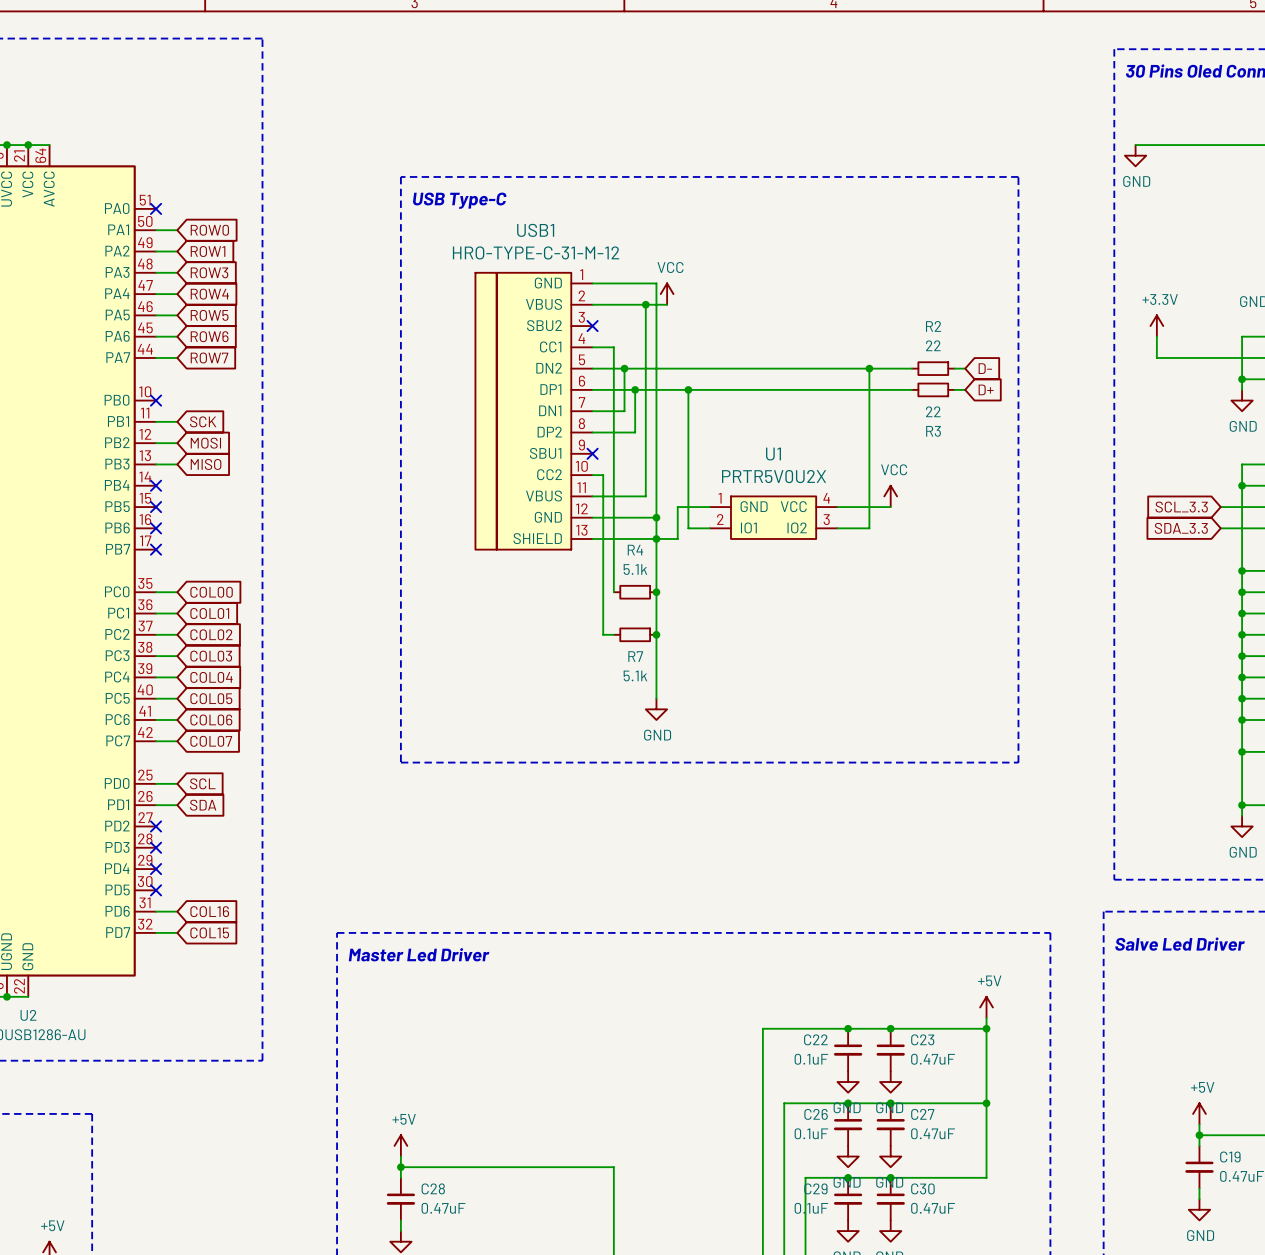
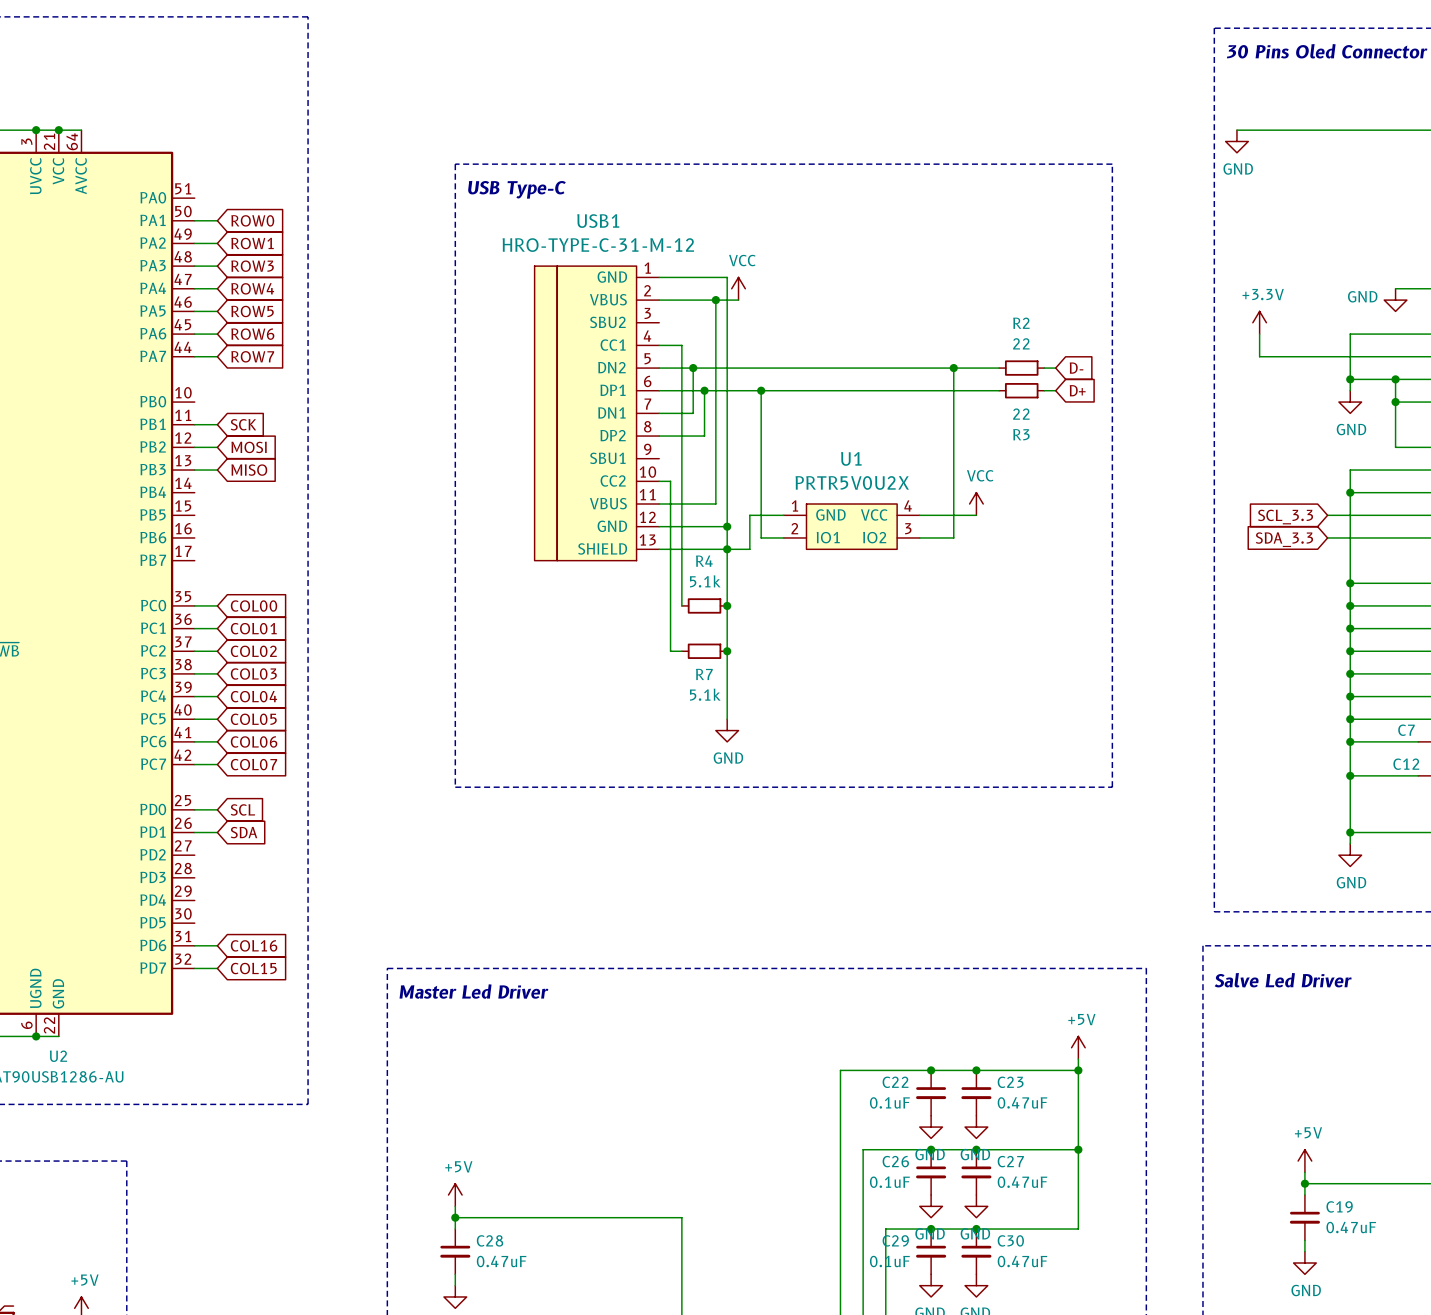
no-connect mark: (156, 208) -> none
no-connect mark: (592, 326) -> none
no-connect mark: (156, 400) -> none
no-connect mark: (592, 453) -> none
no-connect mark: (156, 485) -> none
no-connect mark: (156, 507) -> none
no-connect mark: (156, 528) -> none
no-connect mark: (156, 549) -> none
no-connect mark: (156, 826) -> none
no-connect mark: (156, 847) -> none
no-connect mark: (156, 869) -> none
no-connect mark: (156, 890) -> none

